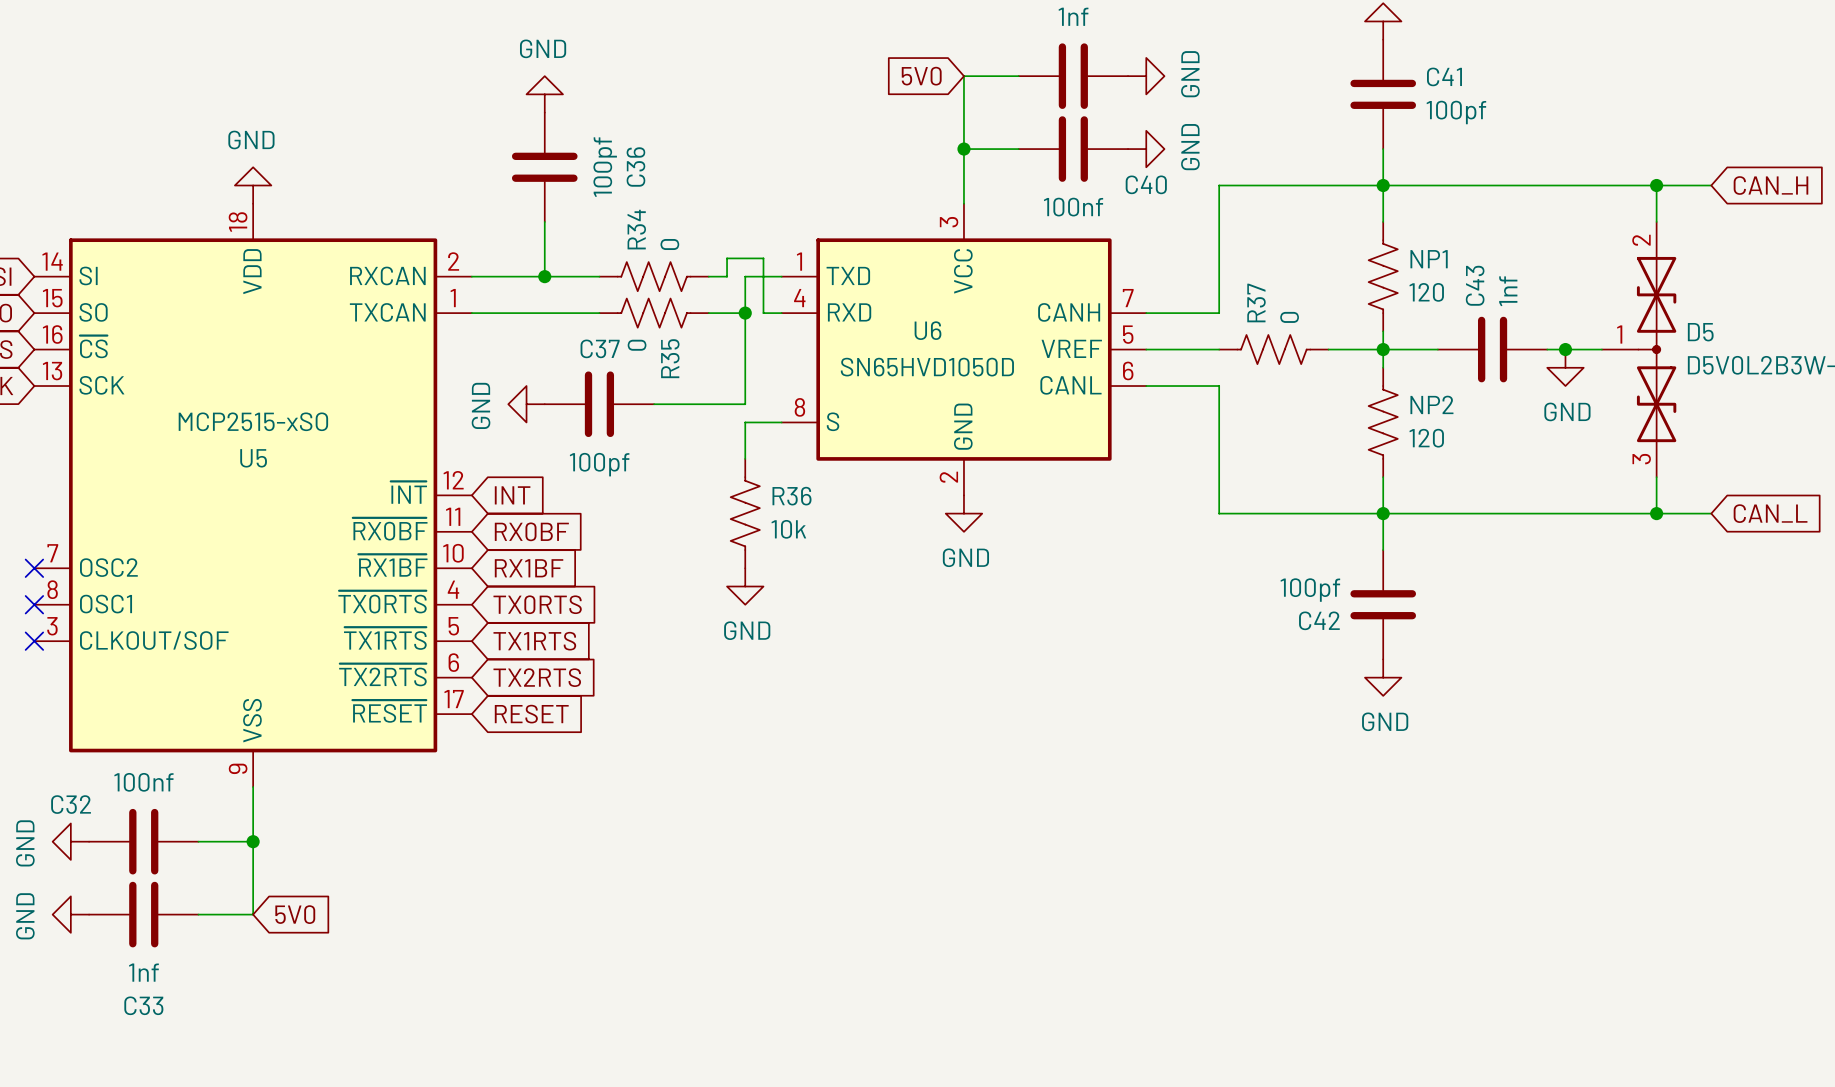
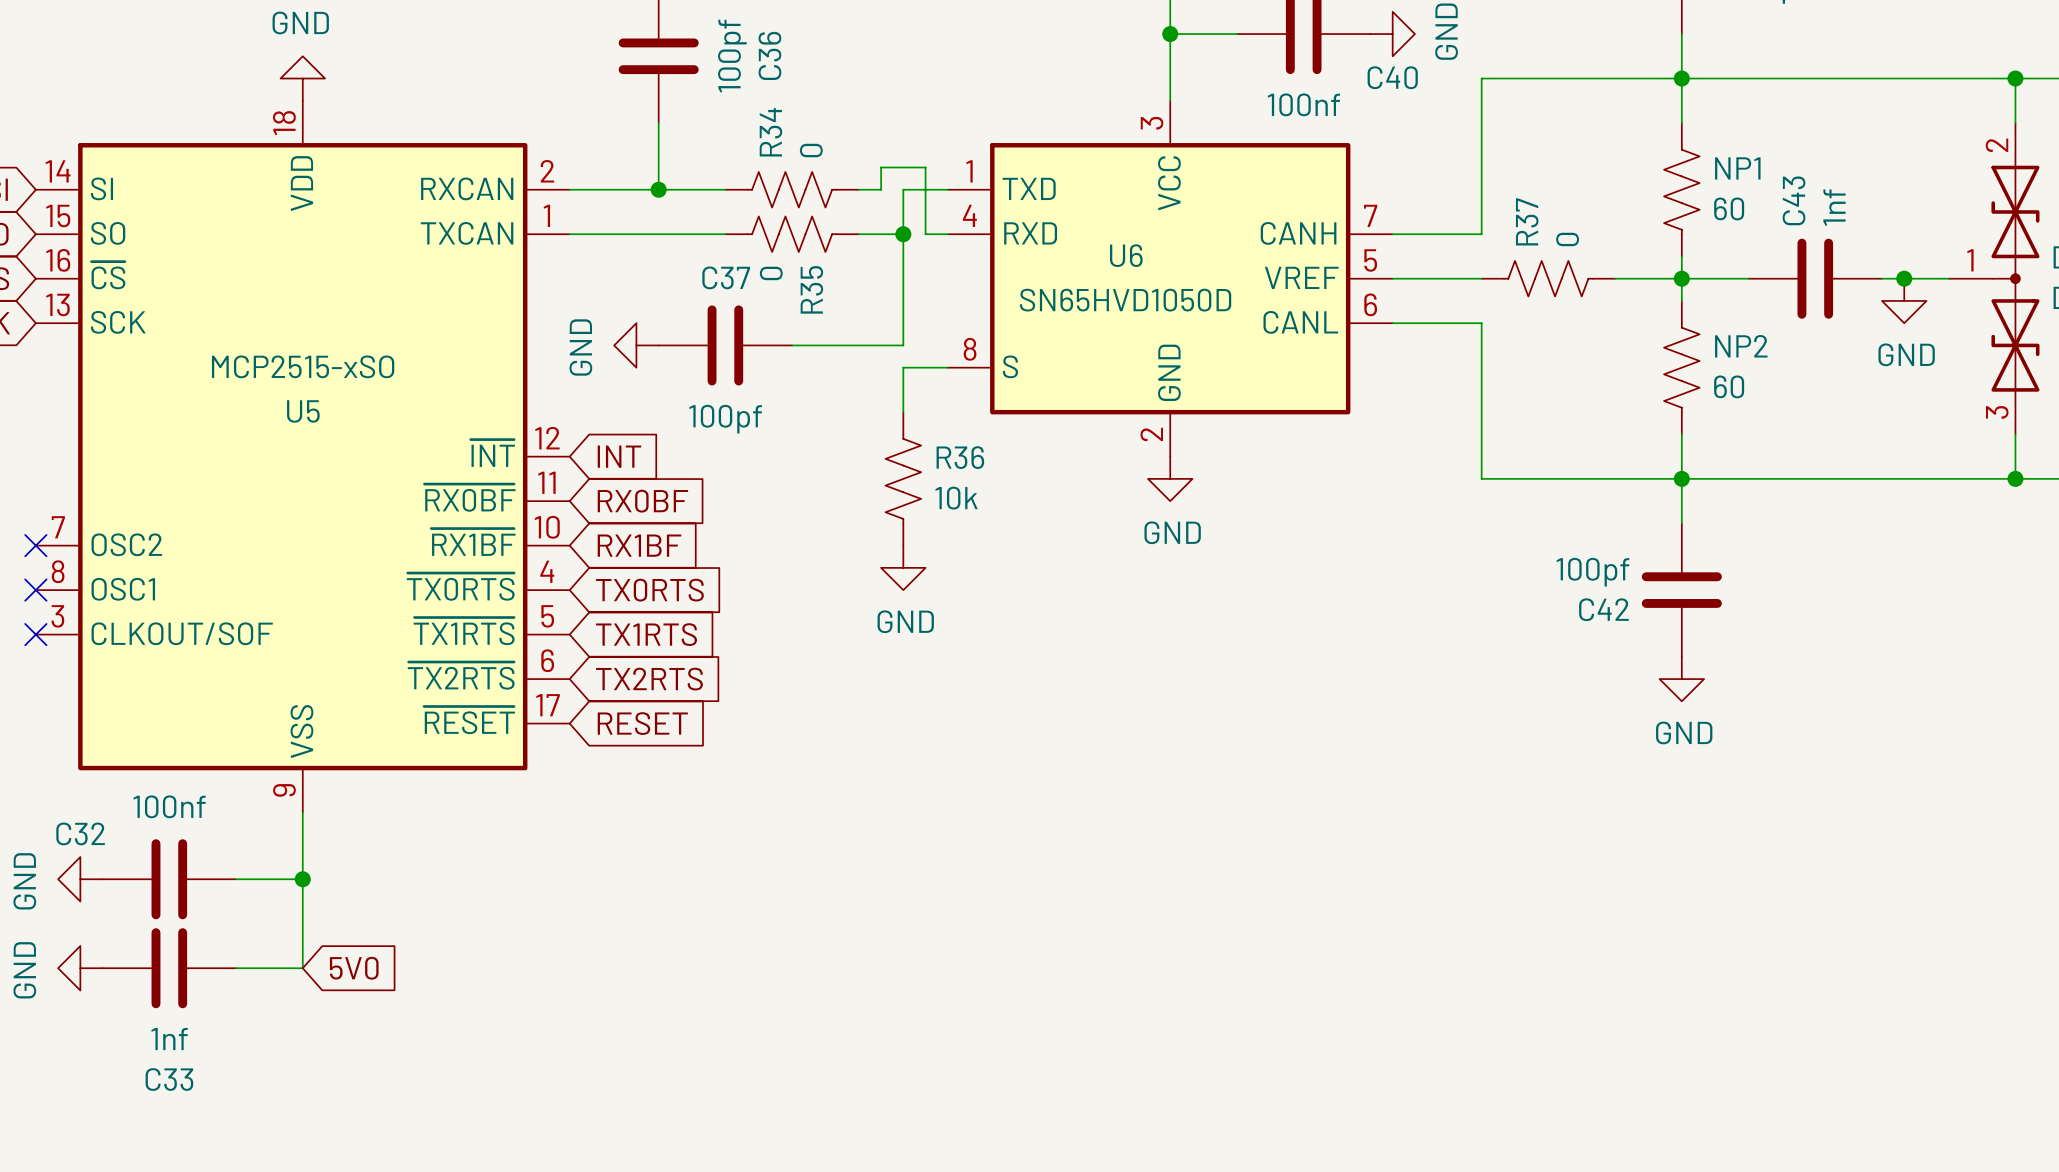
NP1 value: 120 (1426, 292) -> 60 (1729, 208)
NP2 value: 120 (1426, 438) -> 60 (1729, 386)

